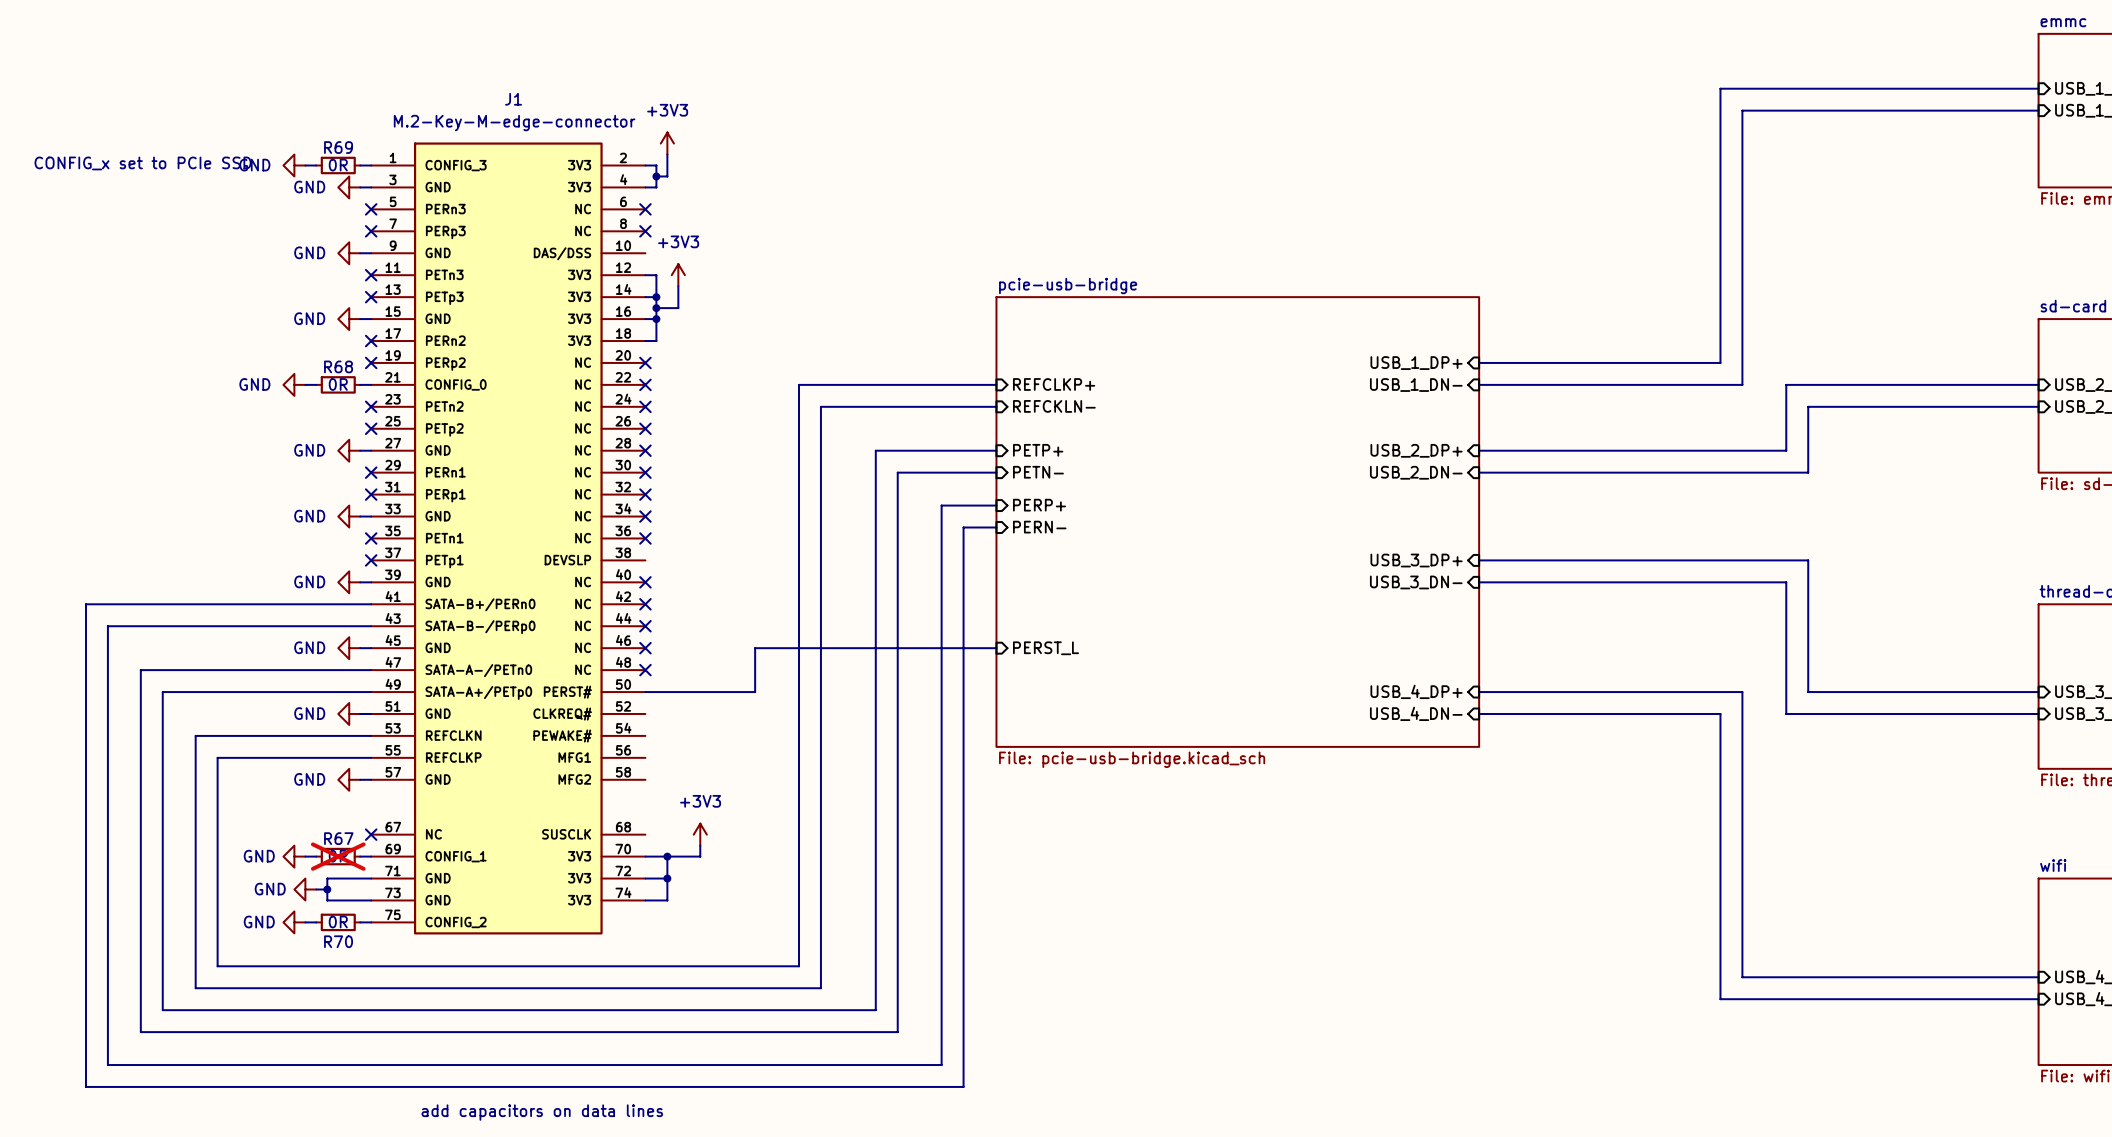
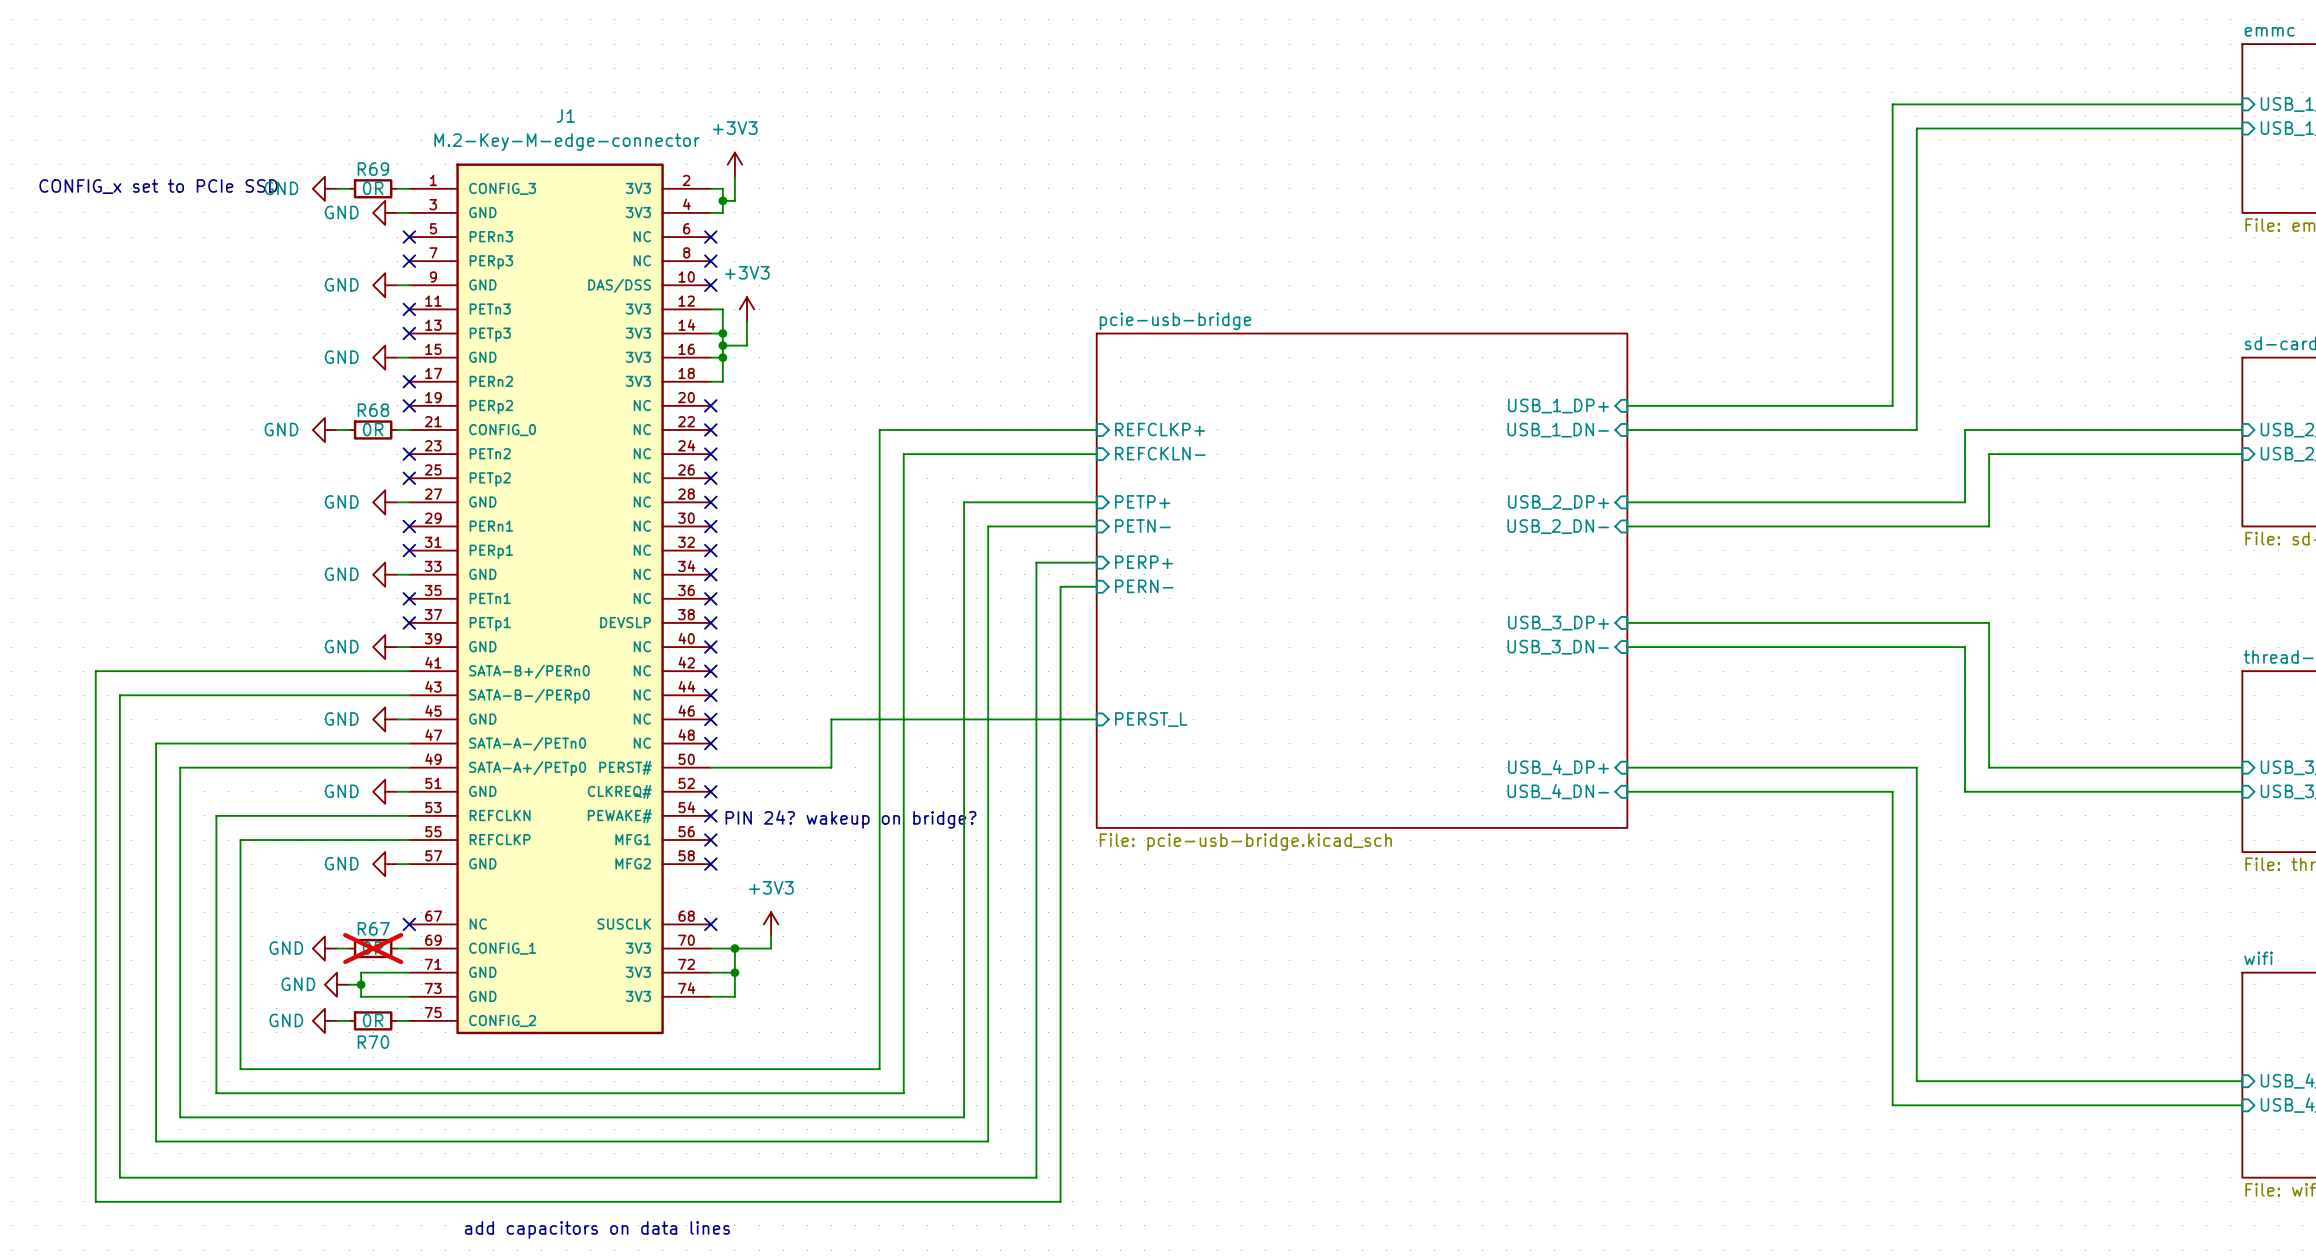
no-connect mark: none -> (710, 285)
no-connect mark: none -> (710, 622)
no-connect mark: none -> (710, 791)
no-connect mark: none -> (710, 815)
text: none -> PIN 24? wakeup on bridge? (850, 819)
no-connect mark: none -> (710, 840)
no-connect mark: none -> (710, 864)
no-connect mark: none -> (710, 924)

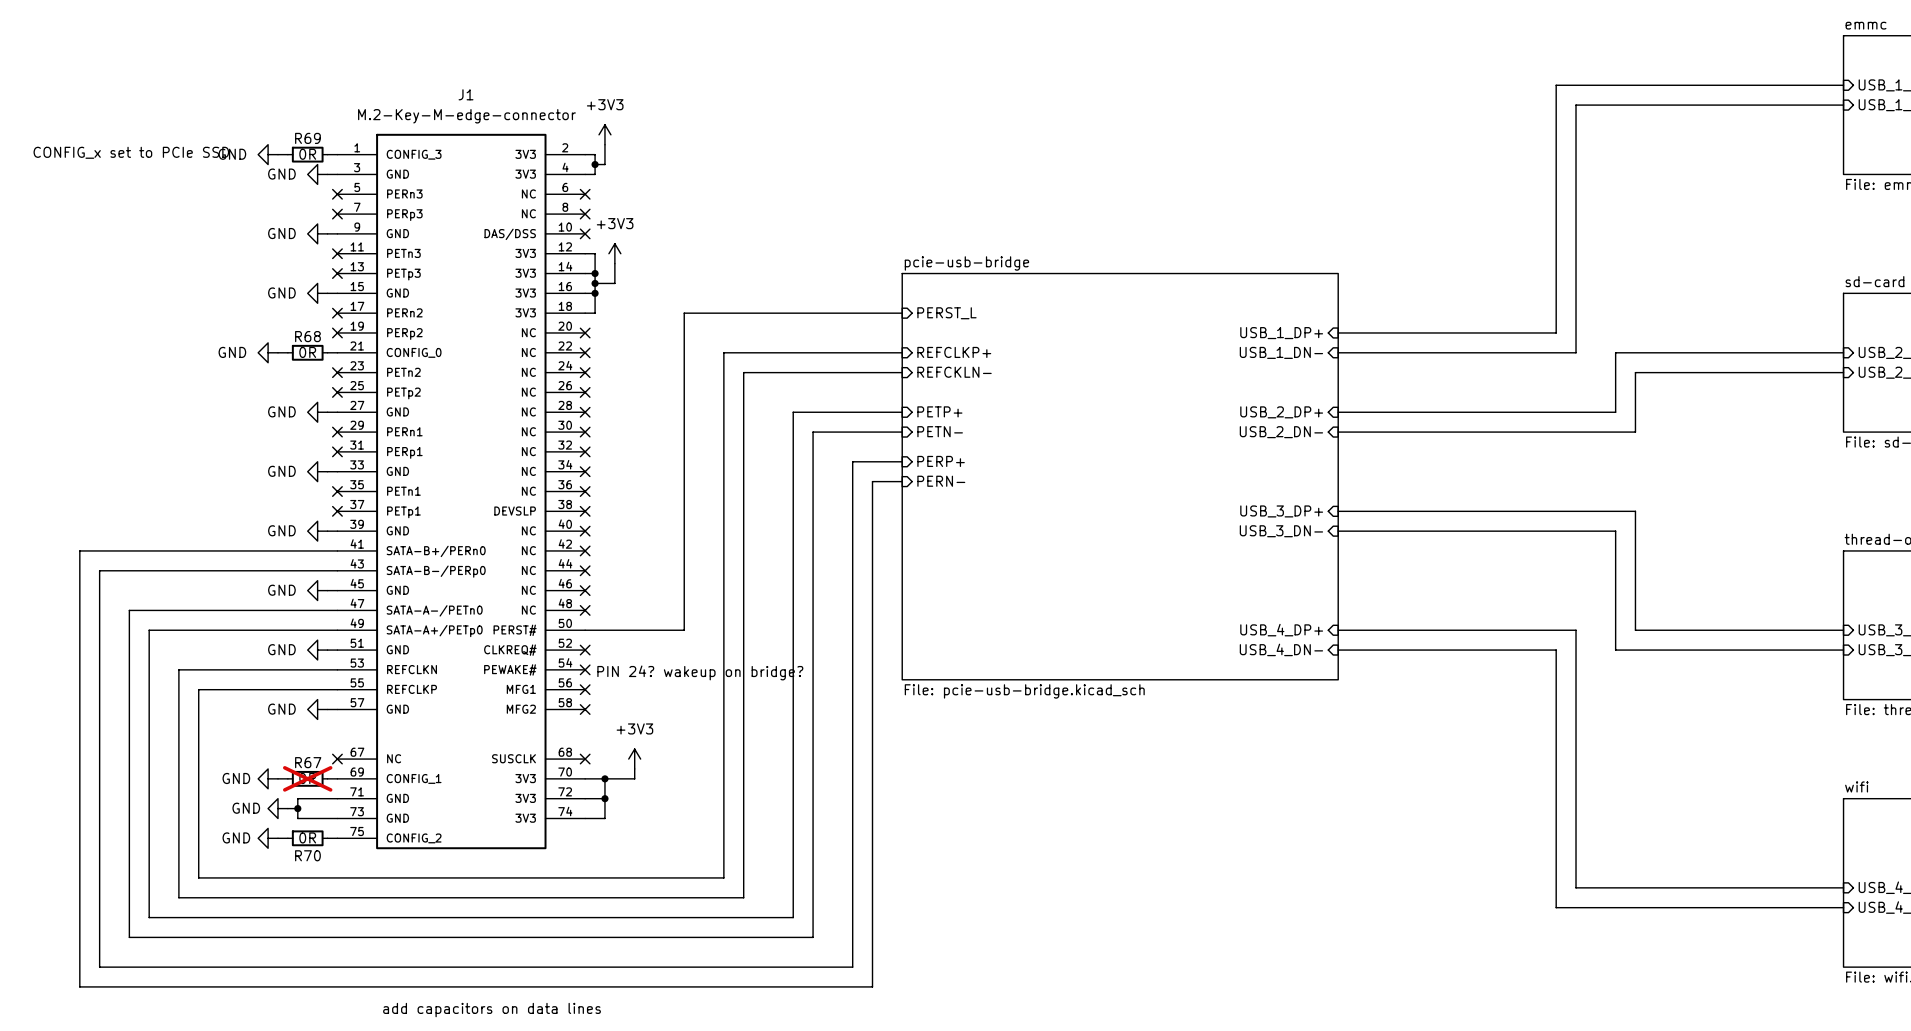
sheet pin: none -> PERST_L (946, 313)
wire: (831, 719) (1096, 719) -> (684, 590) (684, 313) (902, 313)
sheet pin: PERST_L (1151, 719) -> none

